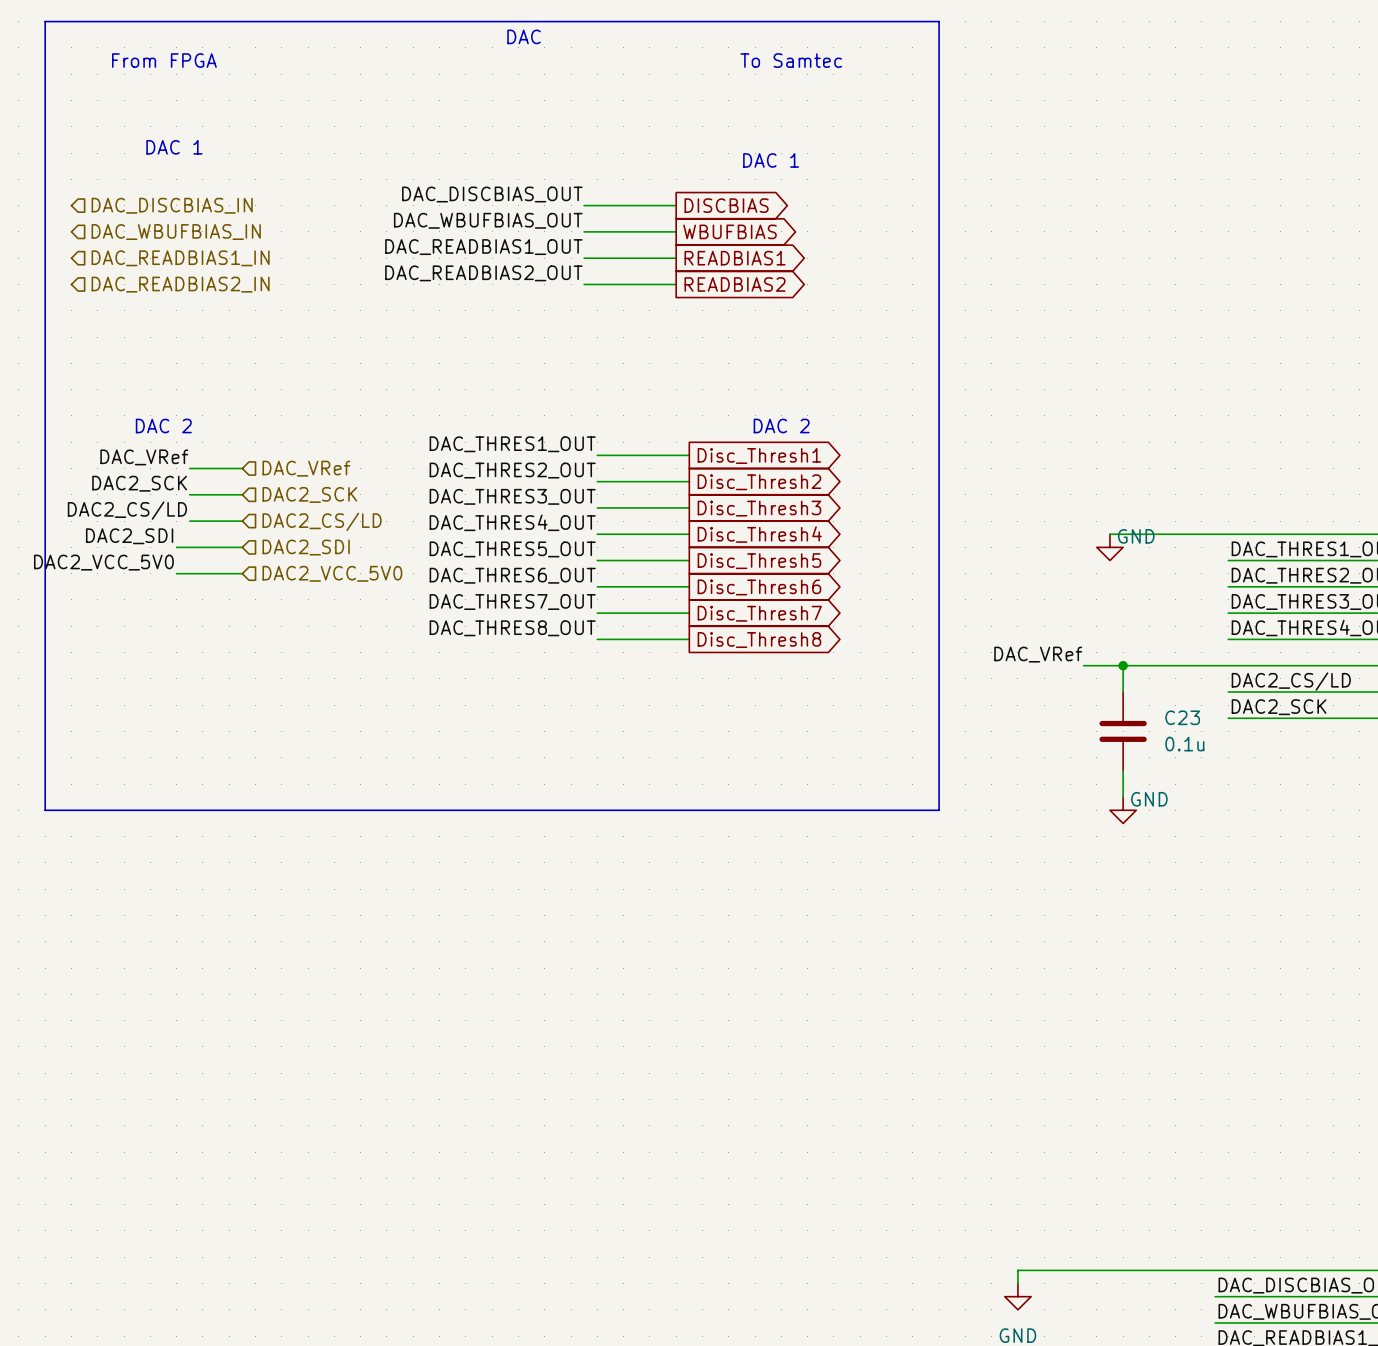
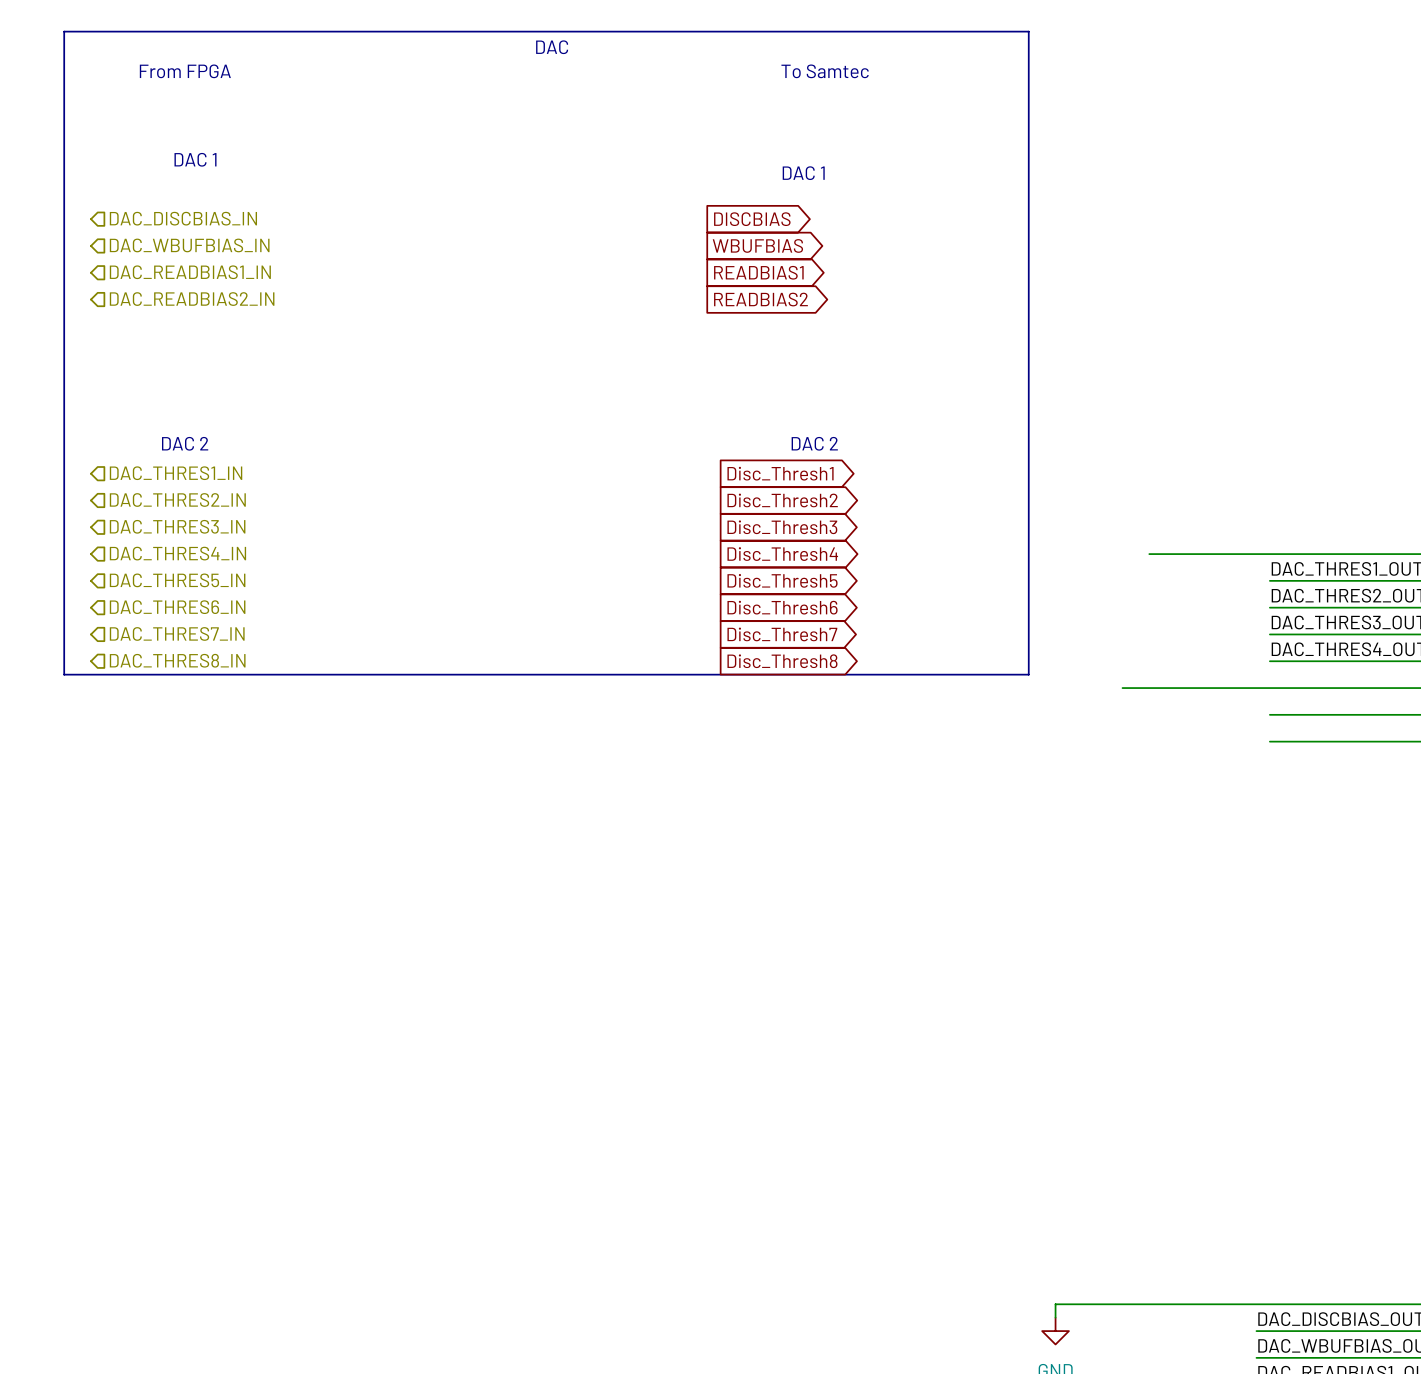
line: (939, 21) (939, 810) (45, 810) (45, 652) -> (975, 31) (1028, 31) (1028, 674) (64, 674)
label: DAC_DISCBIAS_OUT (492, 194) -> none
wire: (584, 205) (676, 205) -> none
label: DAC_WBUFBIAS_OUT (488, 220) -> none
wire: (584, 231) (676, 231) -> none
label: DAC_READBIAS1_OUT (483, 247) -> none
wire: (584, 258) (676, 258) -> none
label: DAC_READBIAS2_OUT (483, 273) -> none
wire: (584, 284) (676, 284) -> none
label: DAC_THRES1_OUT (512, 444) -> none
hierarchical label: none -> DAC_THRES1_IN (176, 473)
wire: (597, 455) (689, 455) -> none
label: DAC_VRef (144, 457) -> none
wire: (189, 468) (242, 468) -> none
hierarchical label: DAC_VRef (306, 468) -> none
label: DAC_THRES2_OUT (512, 470) -> none
hierarchical label: none -> DAC_THRES2_IN (177, 500)
wire: (597, 481) (689, 481) -> none
label: DAC2_SCK (139, 483) -> none
wire: (189, 494) (242, 494) -> none
hierarchical label: DAC2_SCK (309, 494) -> none
label: DAC_THRES3_OUT (512, 496) -> none
wire: (597, 507) (689, 507) -> none
hierarchical label: none -> DAC_THRES3_IN (177, 526)
label: DAC2_CS/LD (127, 510) -> none
wire: (189, 521) (242, 521) -> none
hierarchical label: DAC2_CS/LD (322, 521) -> none
label: DAC_THRES4_OUT (512, 522) -> none
hierarchical label: none -> DAC_THRES4_IN (177, 553)
wire: (597, 534) (689, 534) -> none
label: DAC2_SDI (129, 536) -> none
wire: (176, 547) (242, 547) -> none
hierarchical label: DAC2_SDI (306, 547) -> none
power symbol: GND (1109, 547) -> none
label: DAC_THRES5_OUT (512, 549) -> none
hierarchical label: none -> DAC_THRES5_IN (177, 580)
wire: (597, 560) (689, 560) -> none
label: DAC2_VCC_5V0 (103, 562) -> none
wire: (176, 573) (242, 573) -> none
hierarchical label: DAC2_VCC_5V0 (332, 573) -> none
label: DAC_THRES6_OUT (512, 575) -> none
hierarchical label: none -> DAC_THRES6_IN (177, 607)
wire: (597, 586) (689, 586) -> none
label: DAC_THRES7_OUT (512, 602) -> none
hierarchical label: none -> DAC_THRES7_IN (177, 633)
wire: (597, 613) (689, 613) -> none
label: DAC_THRES8_OUT (512, 628) -> none
hierarchical label: none -> DAC_THRES8_IN (177, 660)
wire: (597, 639) (689, 639) -> none
label: DAC_VRef (1038, 654) -> none
wire: (1123, 665) (1123, 691) -> none
junction: (1123, 665) -> none
label: DAC2_CS/LD (1291, 681) -> none
label: DAC2_SCK (1279, 707) -> none
C23: 0.1u (1123, 731) -> none
wire: (1123, 770) (1123, 797) -> none
power symbol: GND (1123, 810) -> none

